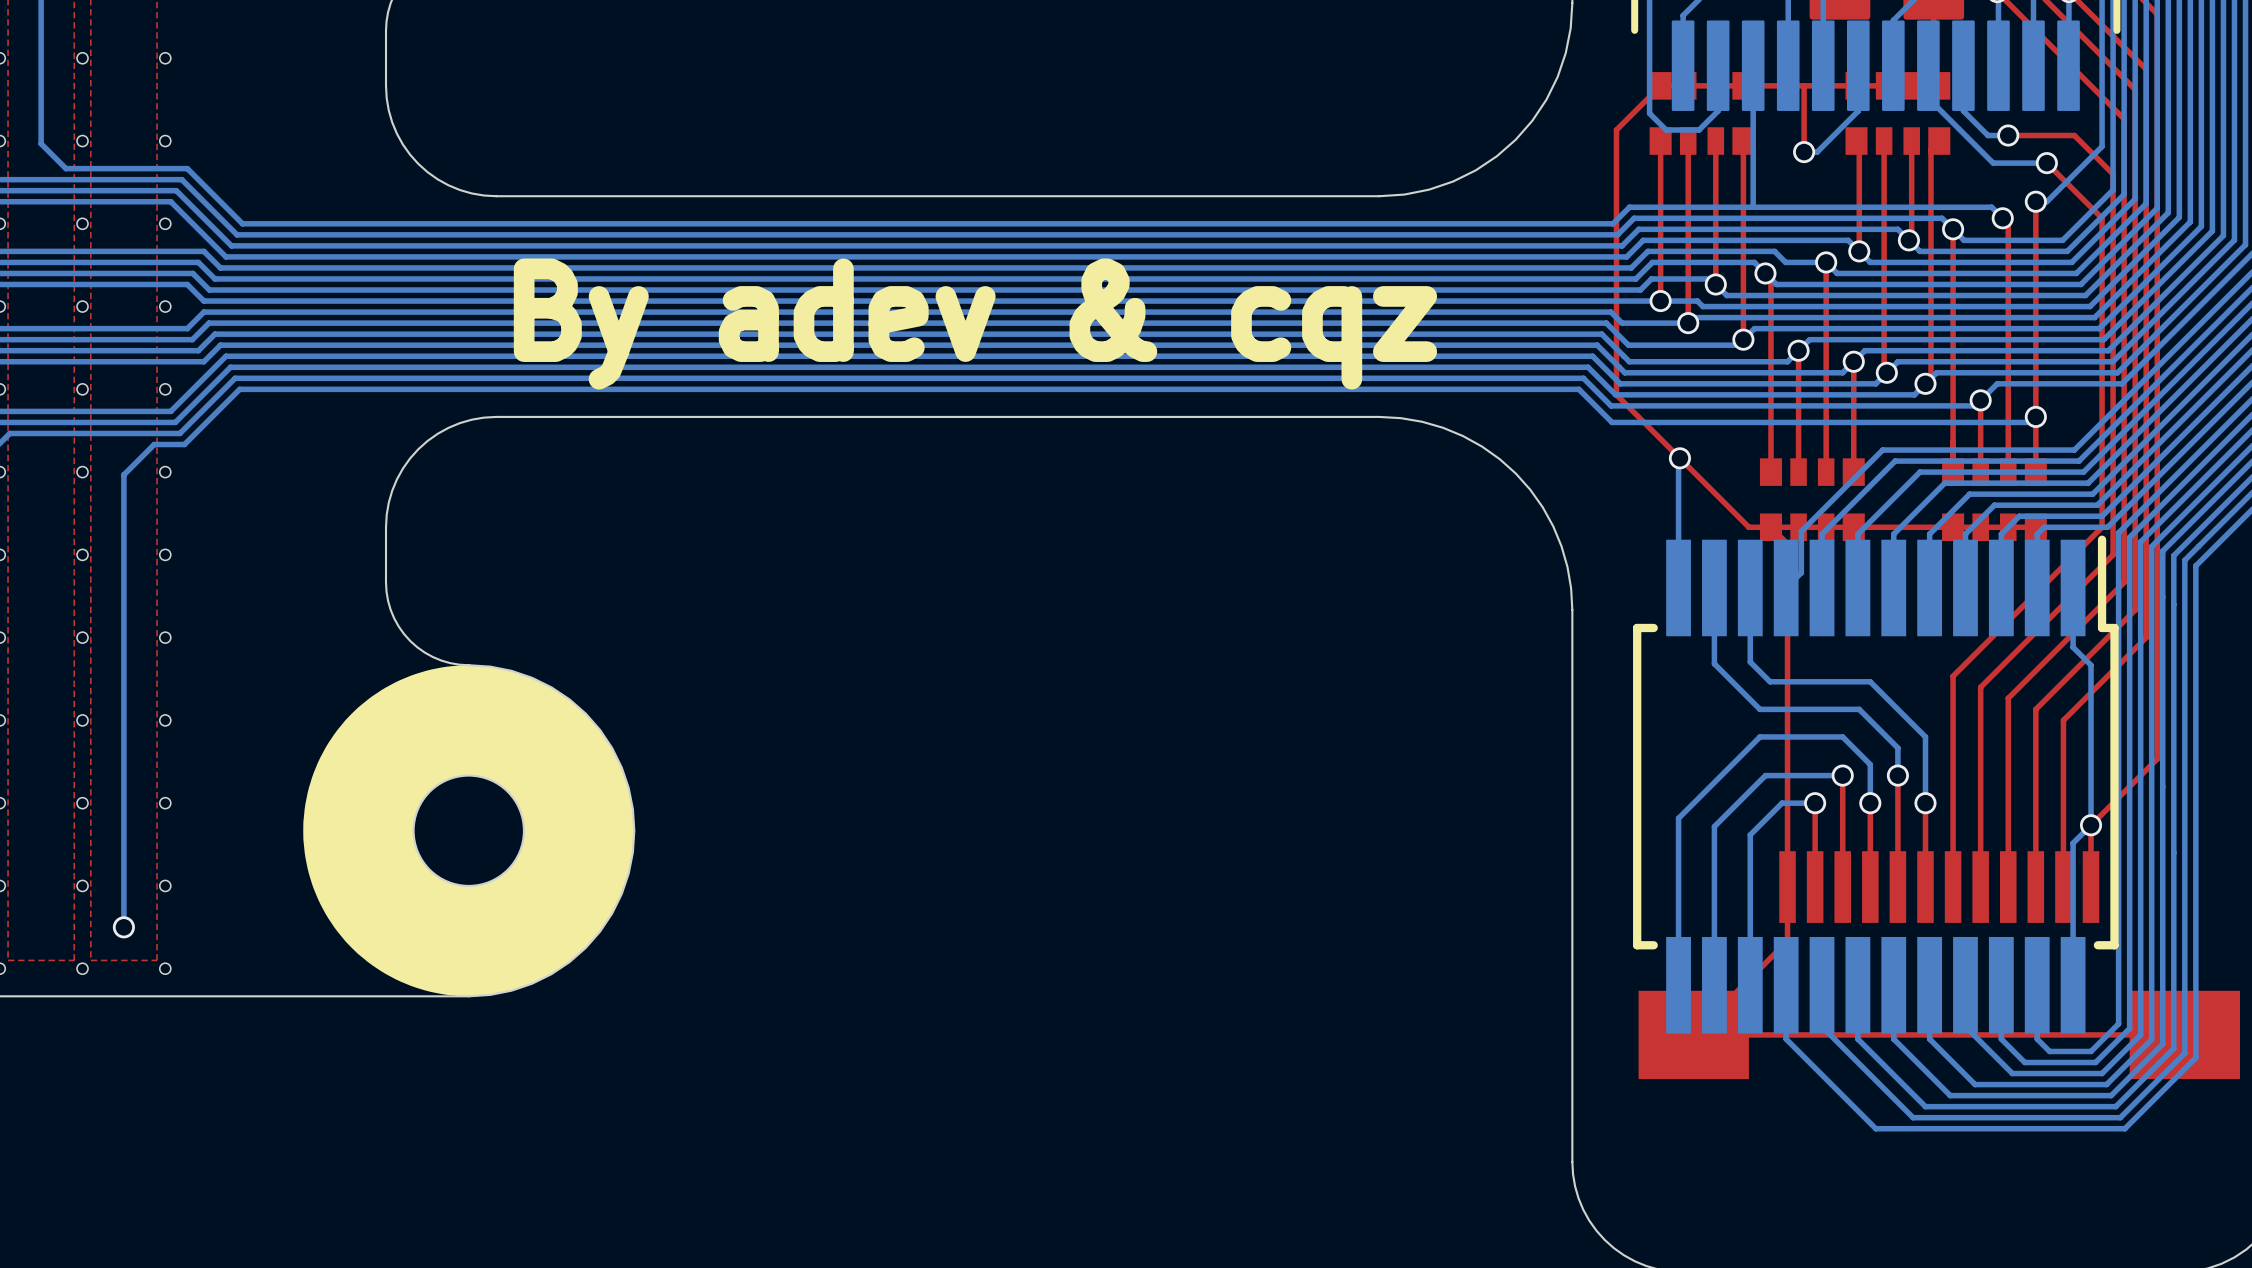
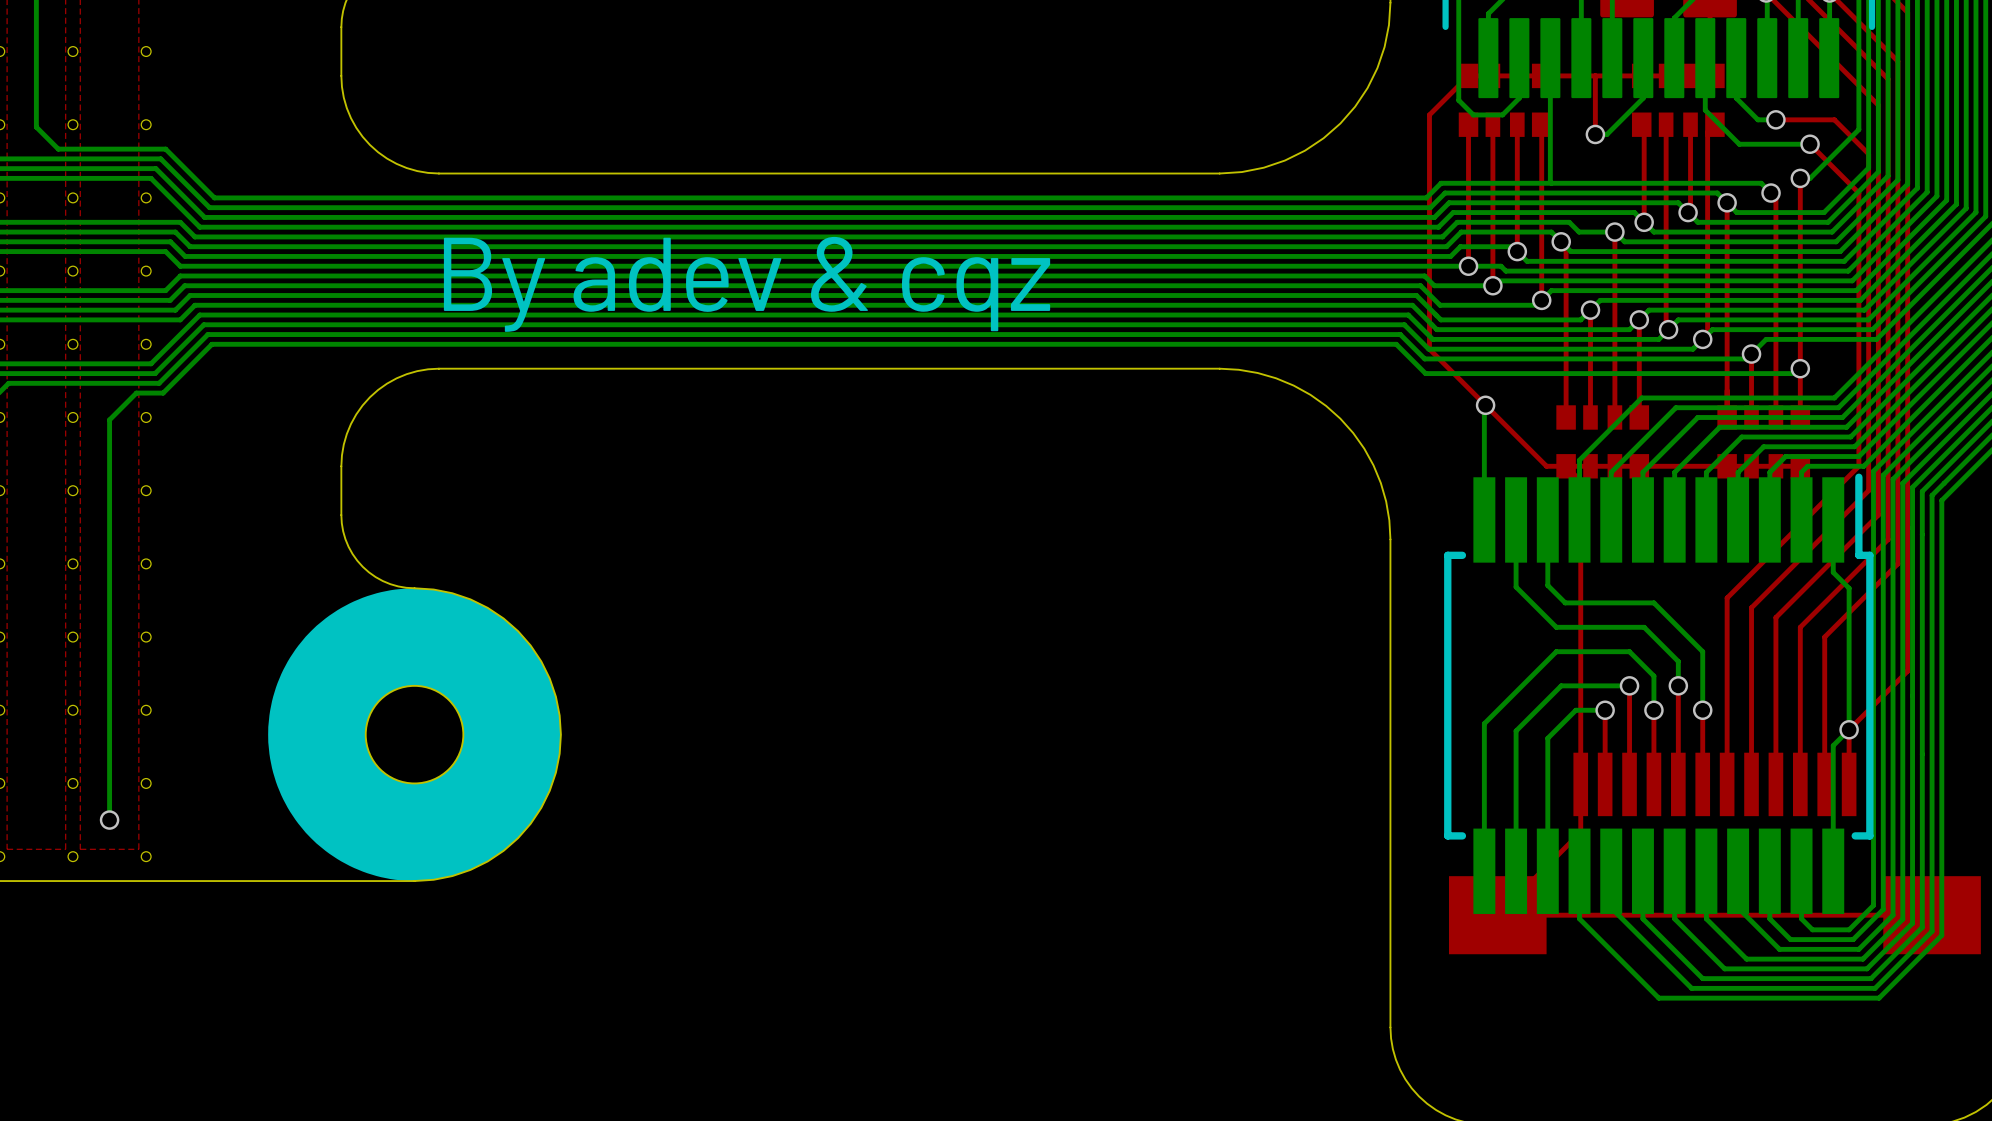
bottom track: (1928, 98) (1993, 163) -> (1705, 86) (1705, 110) (1739, 144) (1762, 144)
bottom track: (1882, 450) (1801, 531) (1801, 572) (1786, 587) -> (1664, 397) (1641, 397) (1579, 460) (1579, 519)

